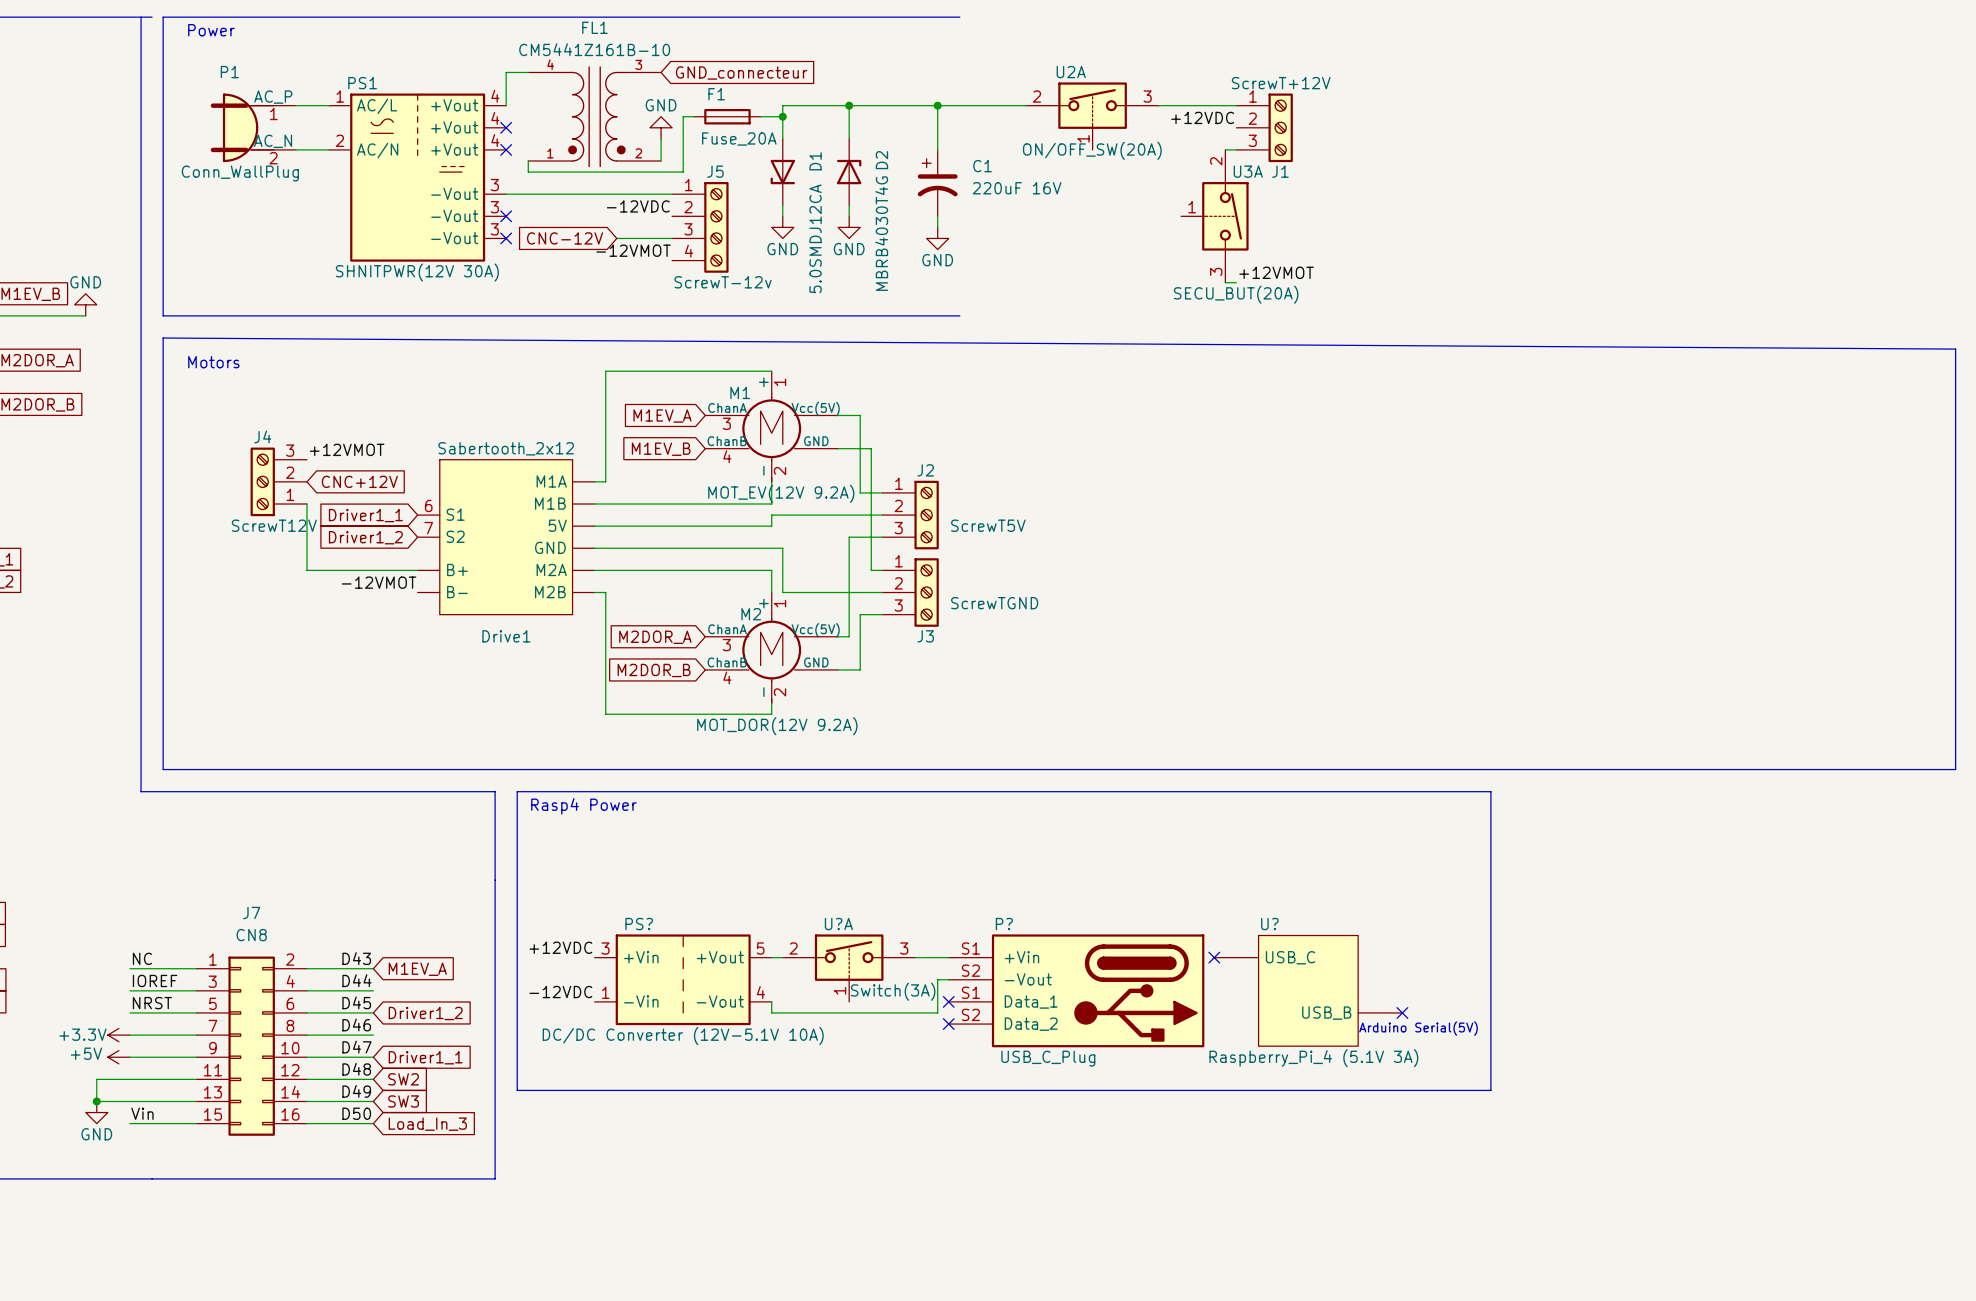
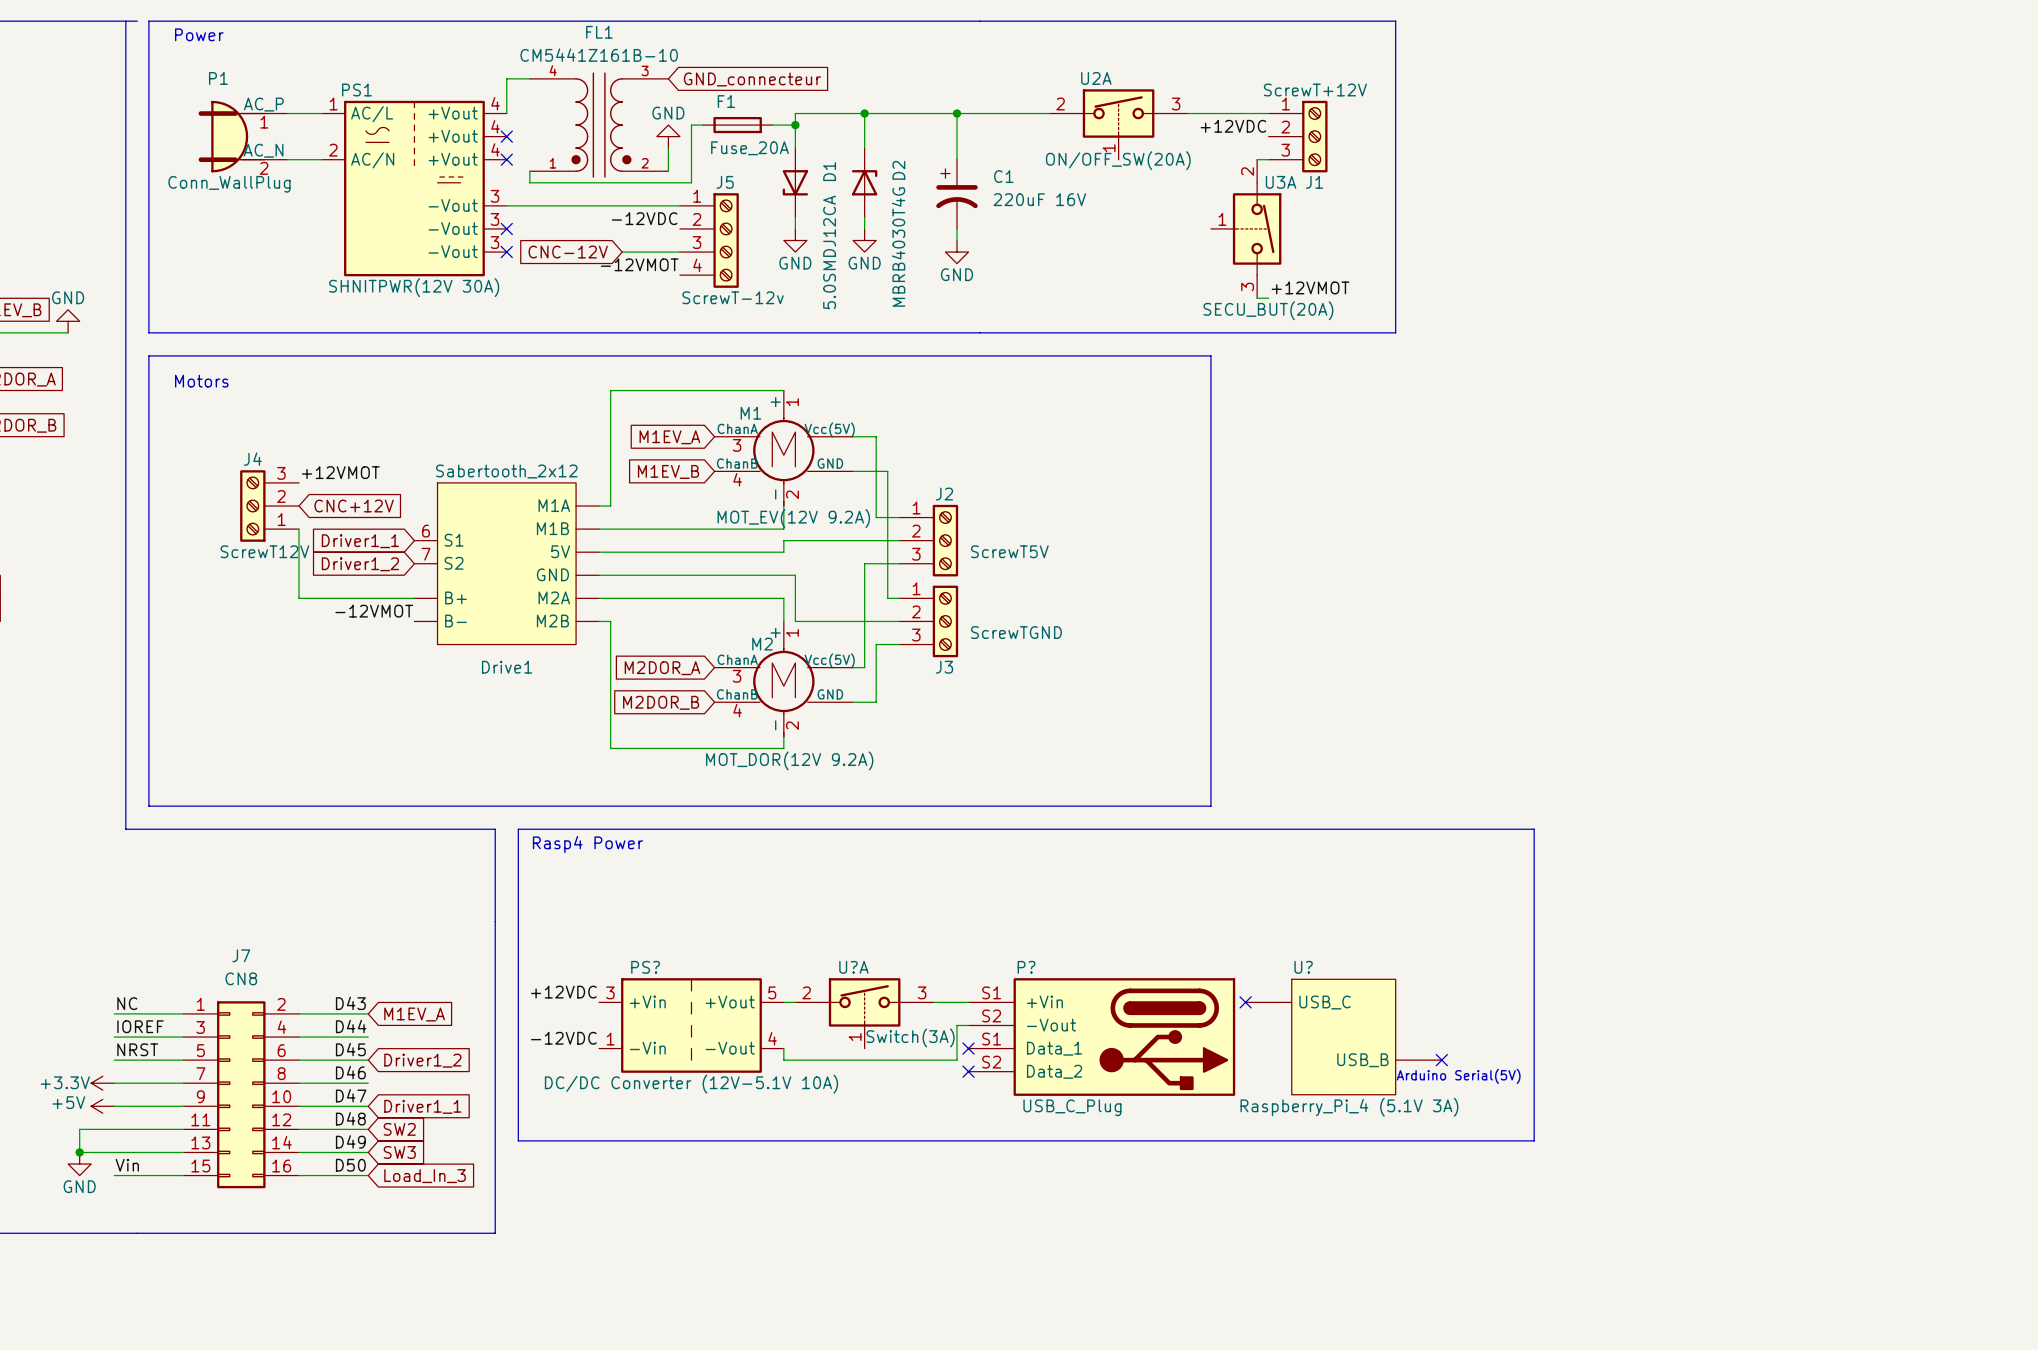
line: none -> (980, 21) (1395, 21) (1395, 332) (980, 332)
line: (163, 338) (1955, 349) (1955, 769) (1181, 769) -> (148, 355) (1210, 355) (1210, 806)

